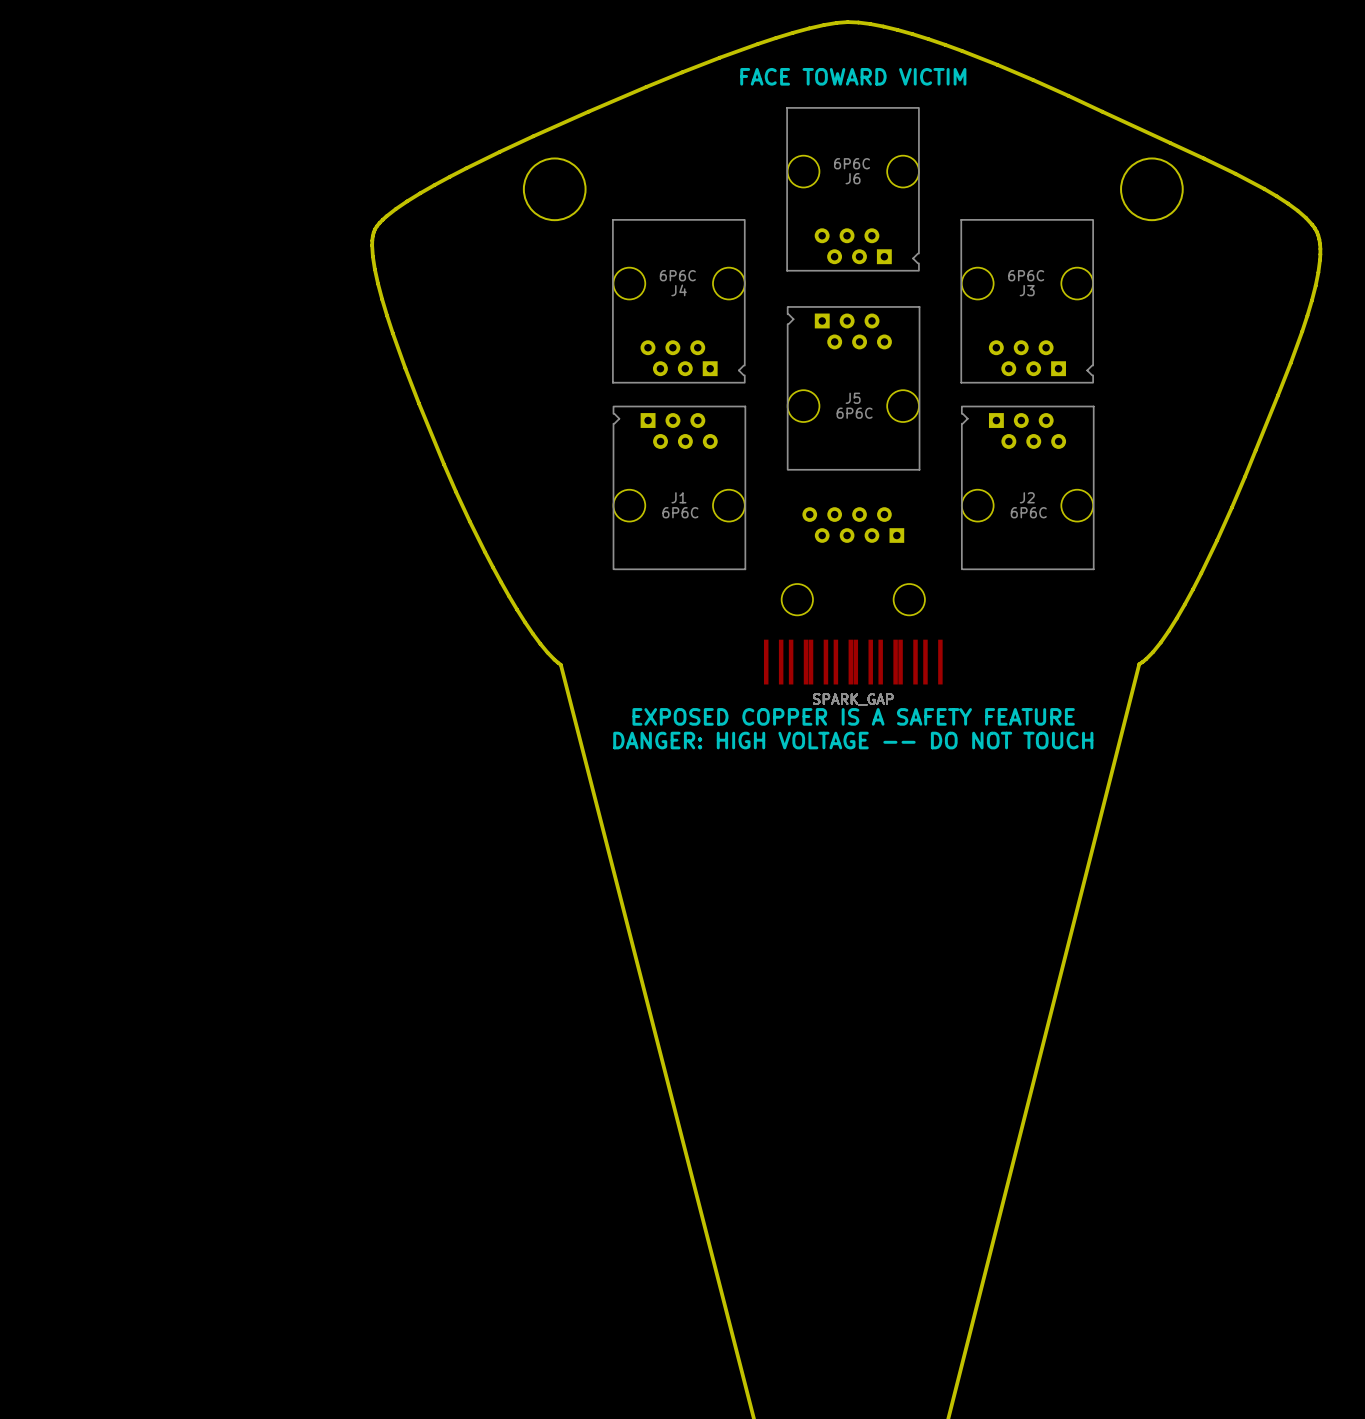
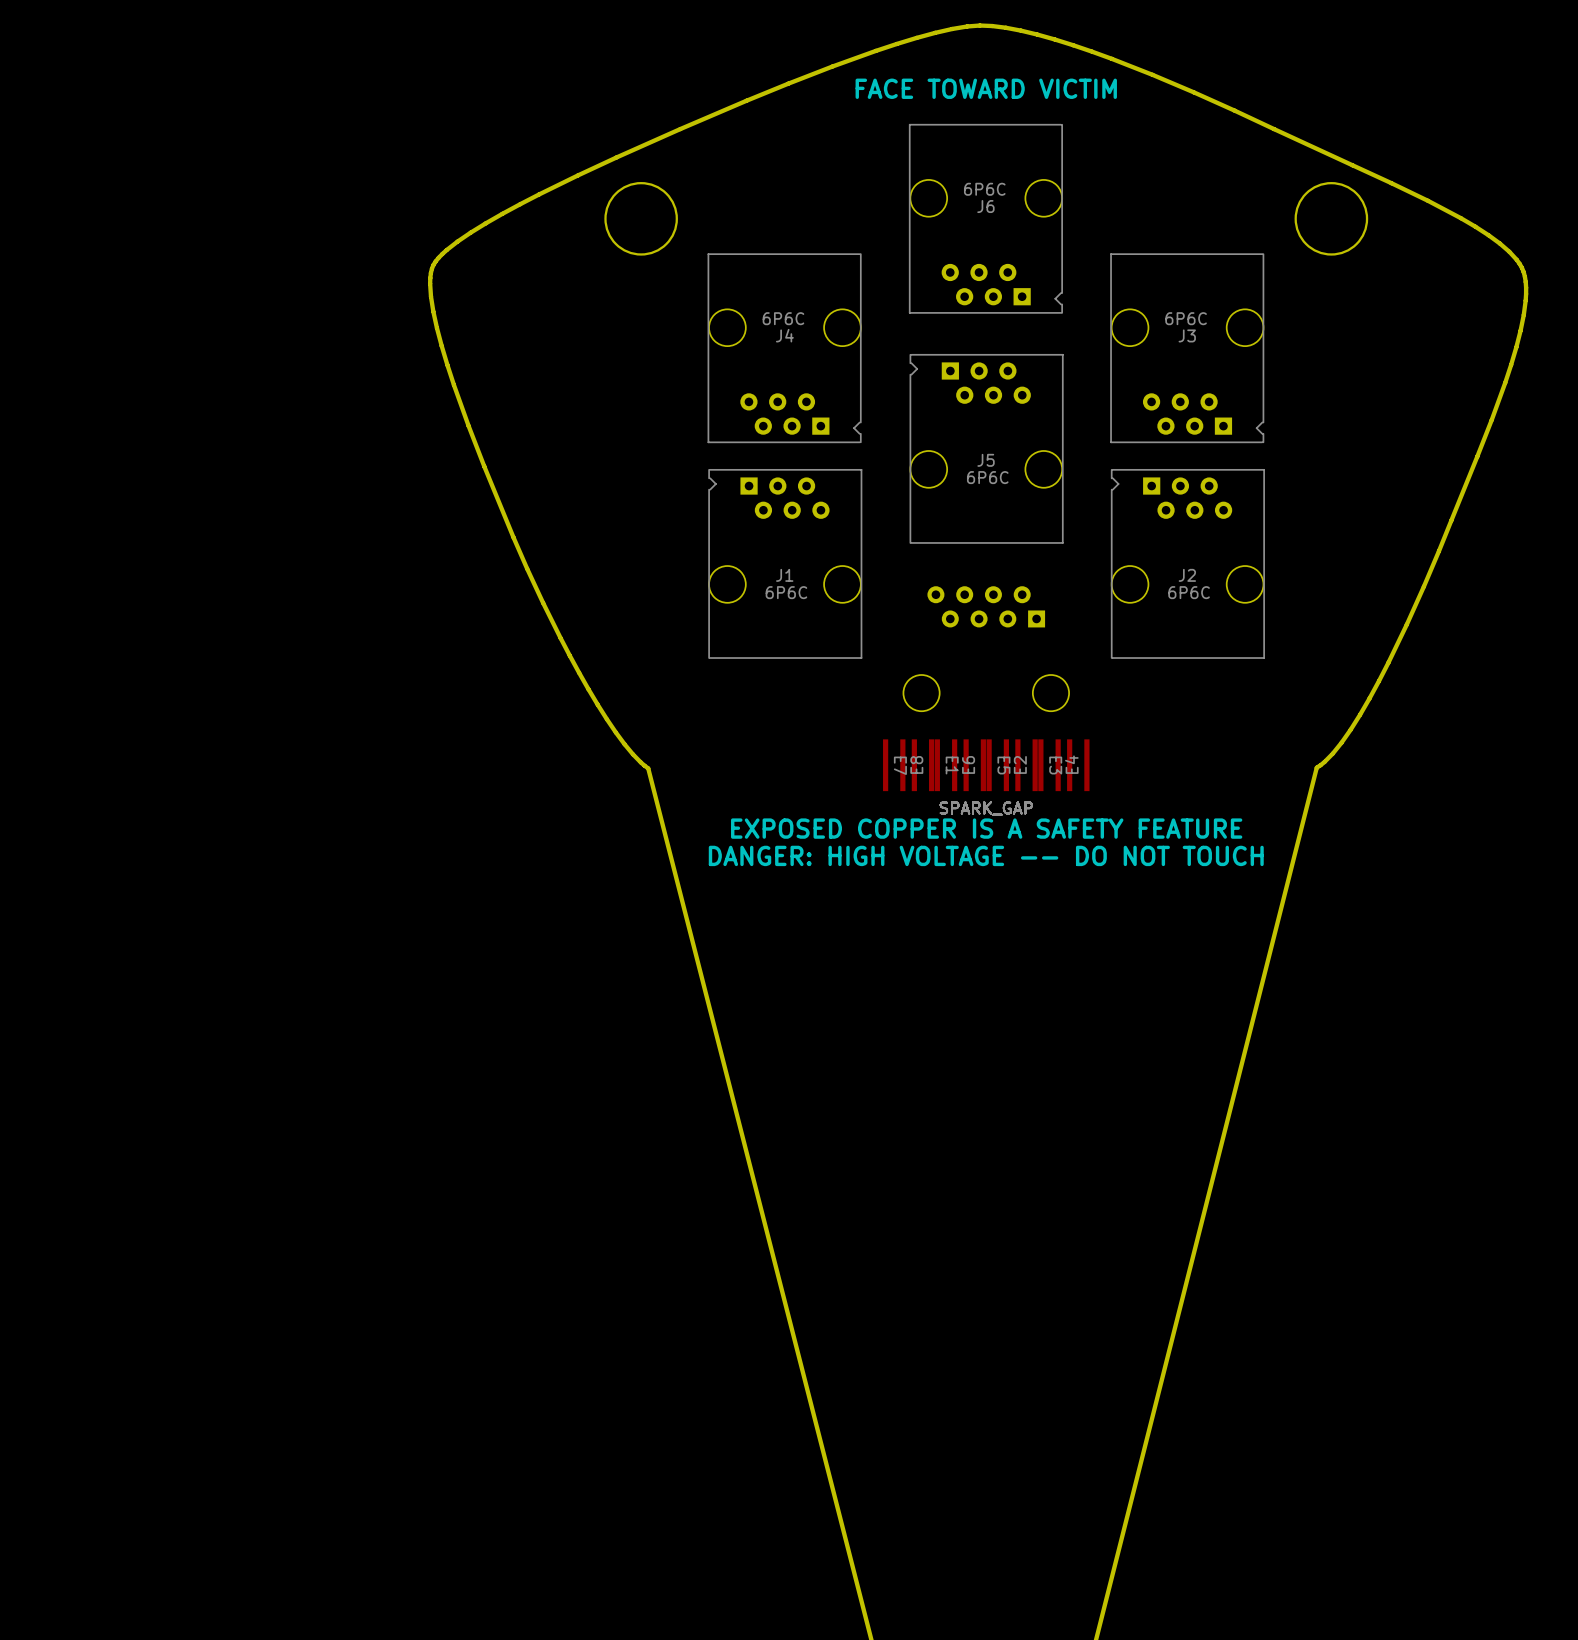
E8 name: none -> E8 (916, 764)
E6 name: none -> E6 (968, 764)
E2 name: none -> E2 (1020, 764)
E4 name: none -> E4 (1071, 764)
E7 name: none -> E7 (900, 765)
E1 name: none -> E1 (952, 765)
E5 name: none -> E5 (1003, 765)
E3 name: none -> E3 (1055, 765)

